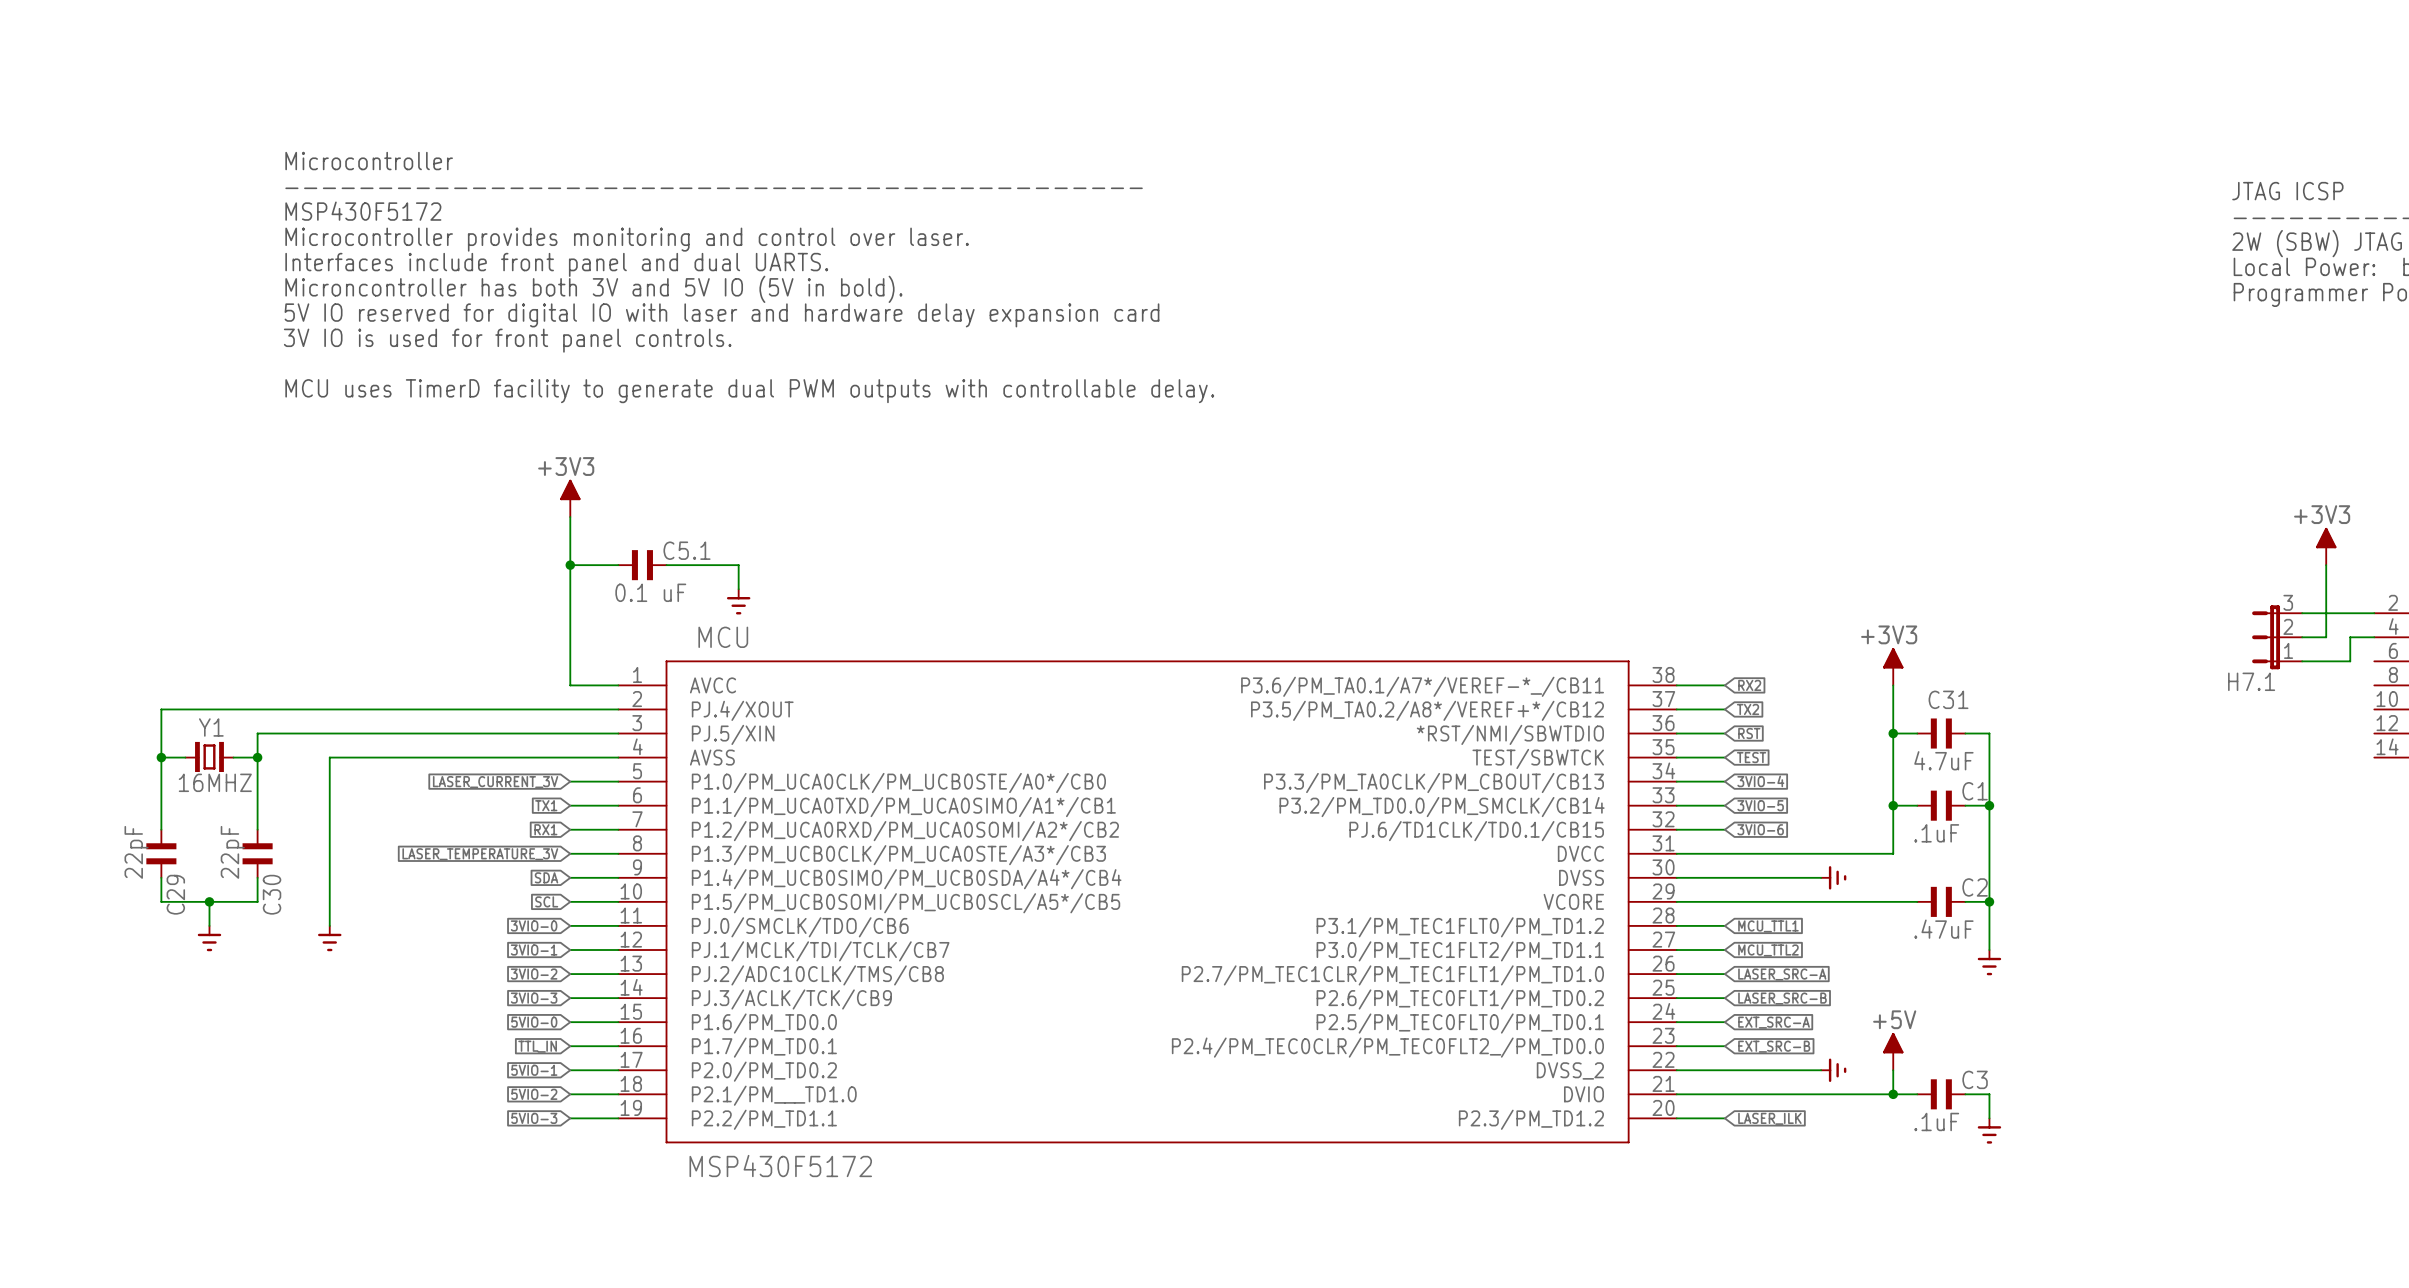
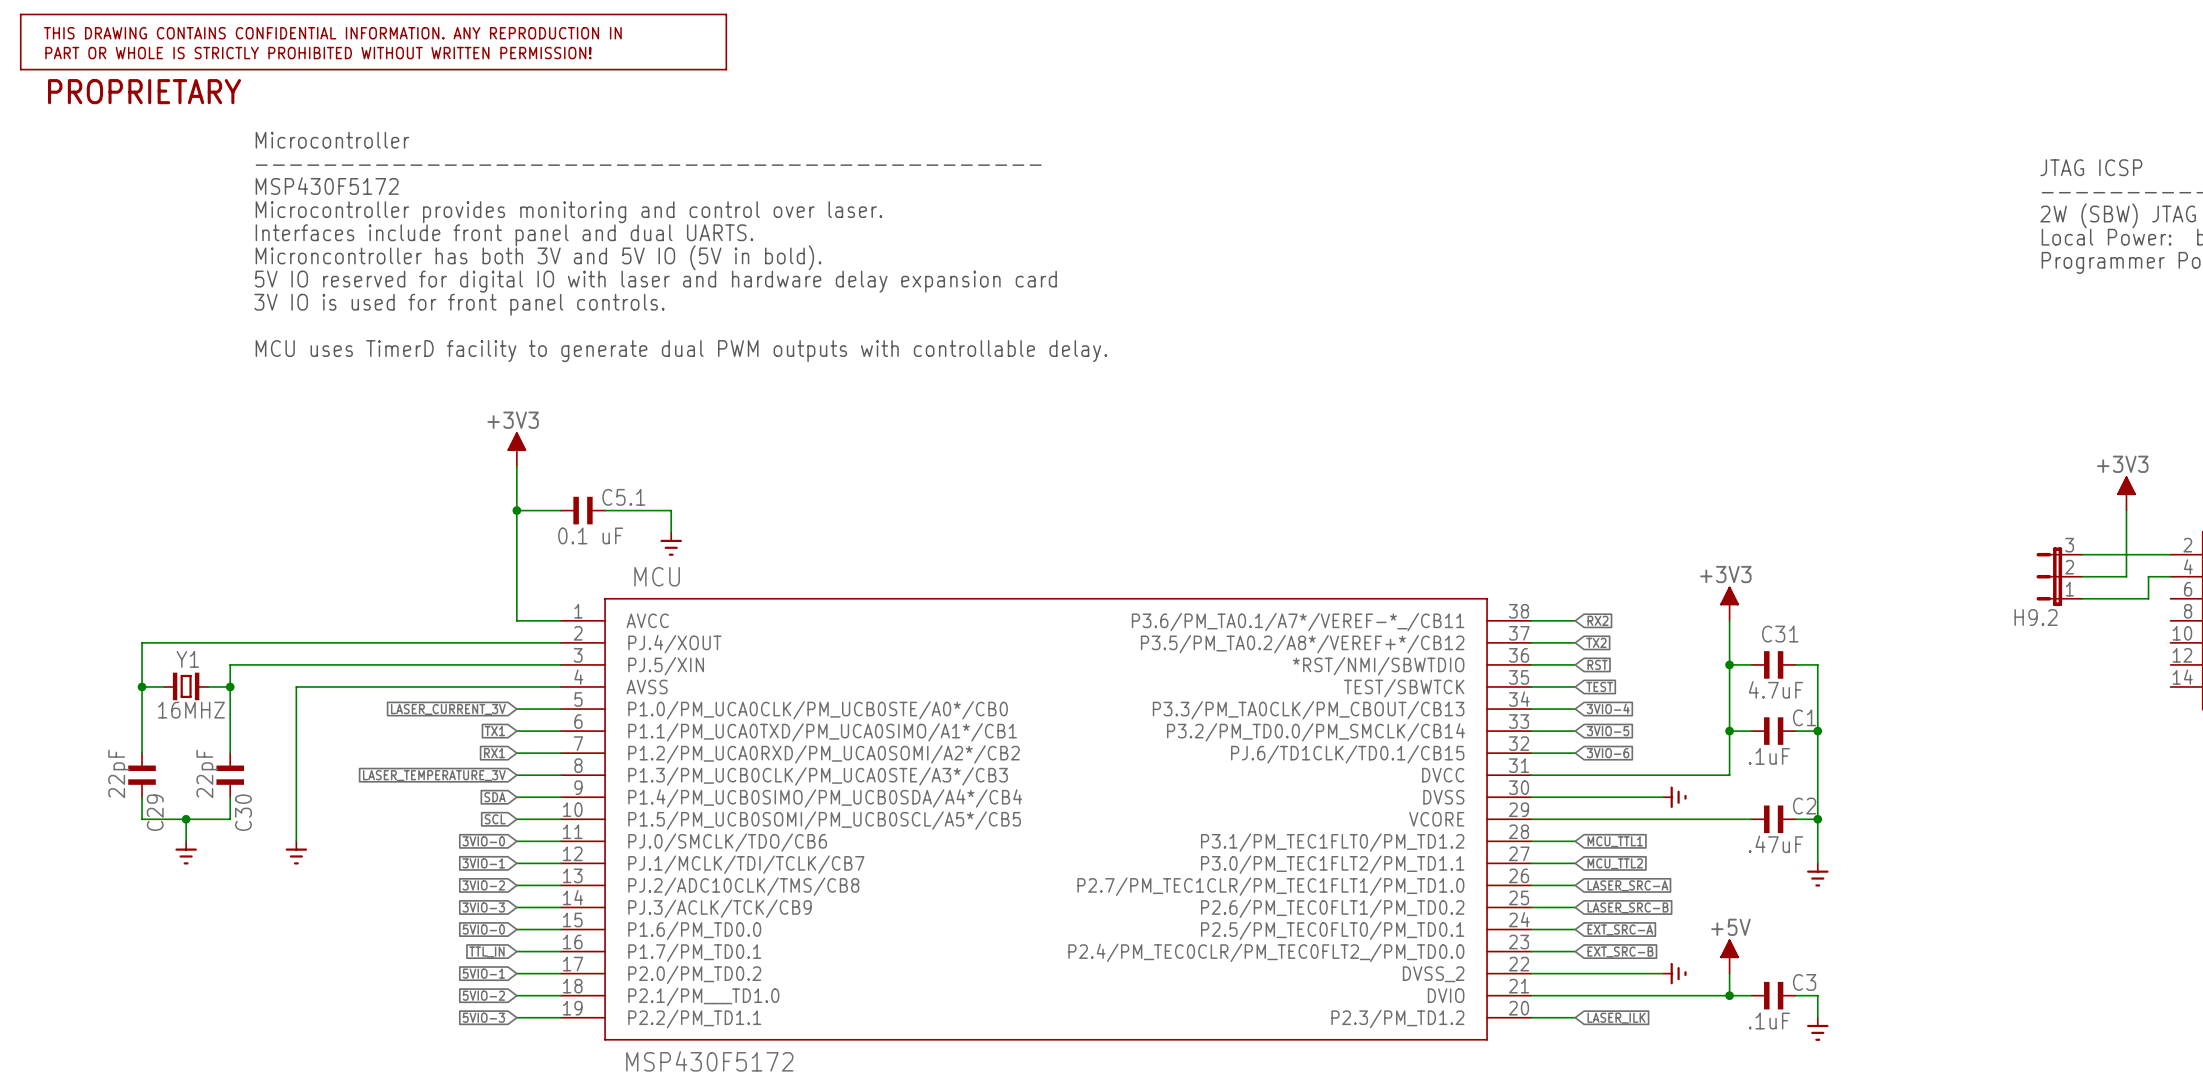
part: none -> (373, 42)
H9.2: none -> (2059, 576)
H7.1: (2277, 637) -> none

